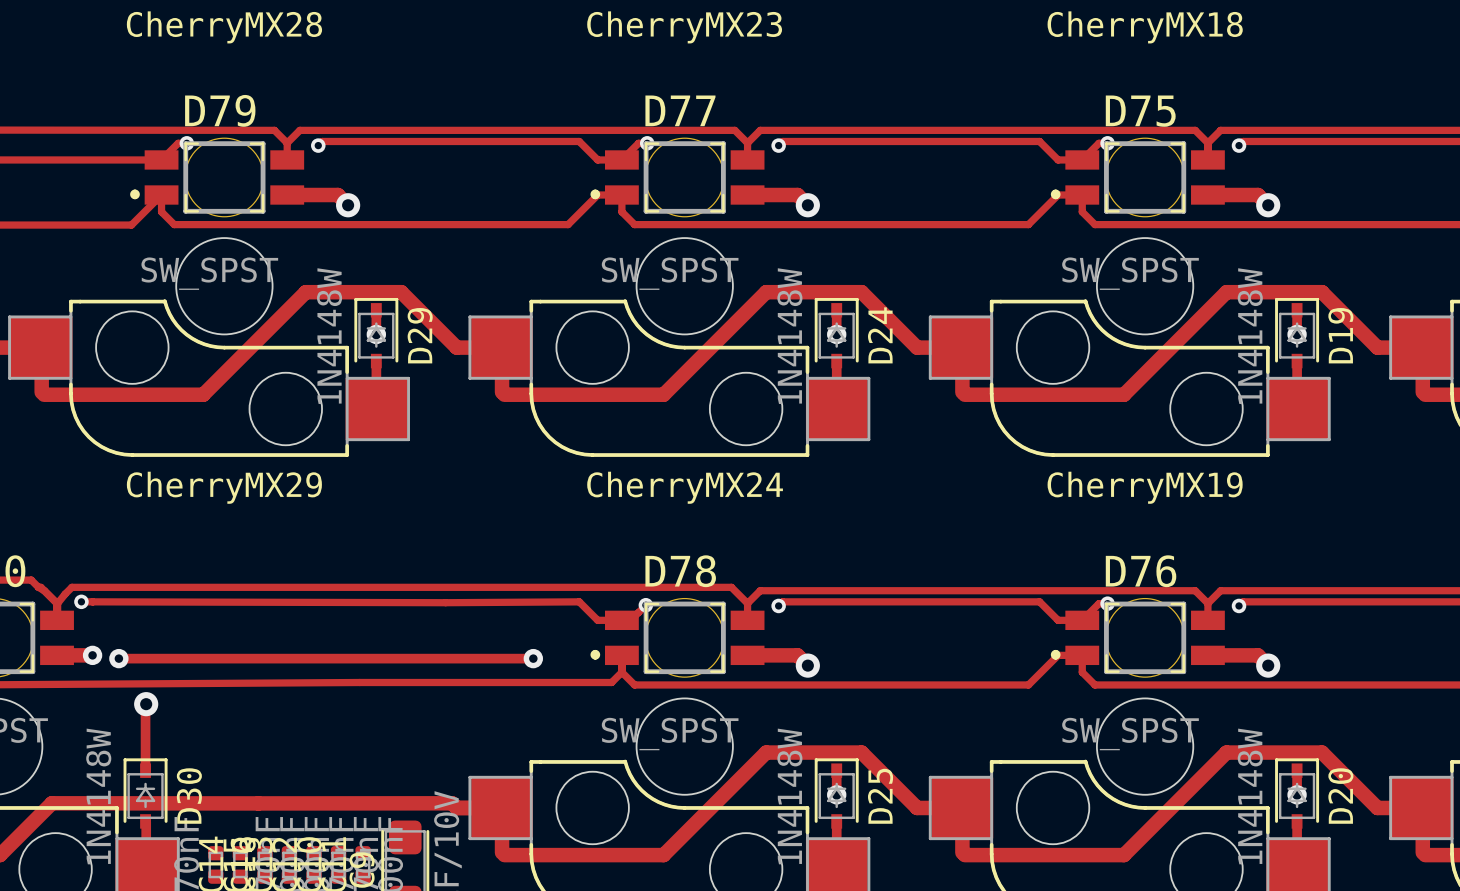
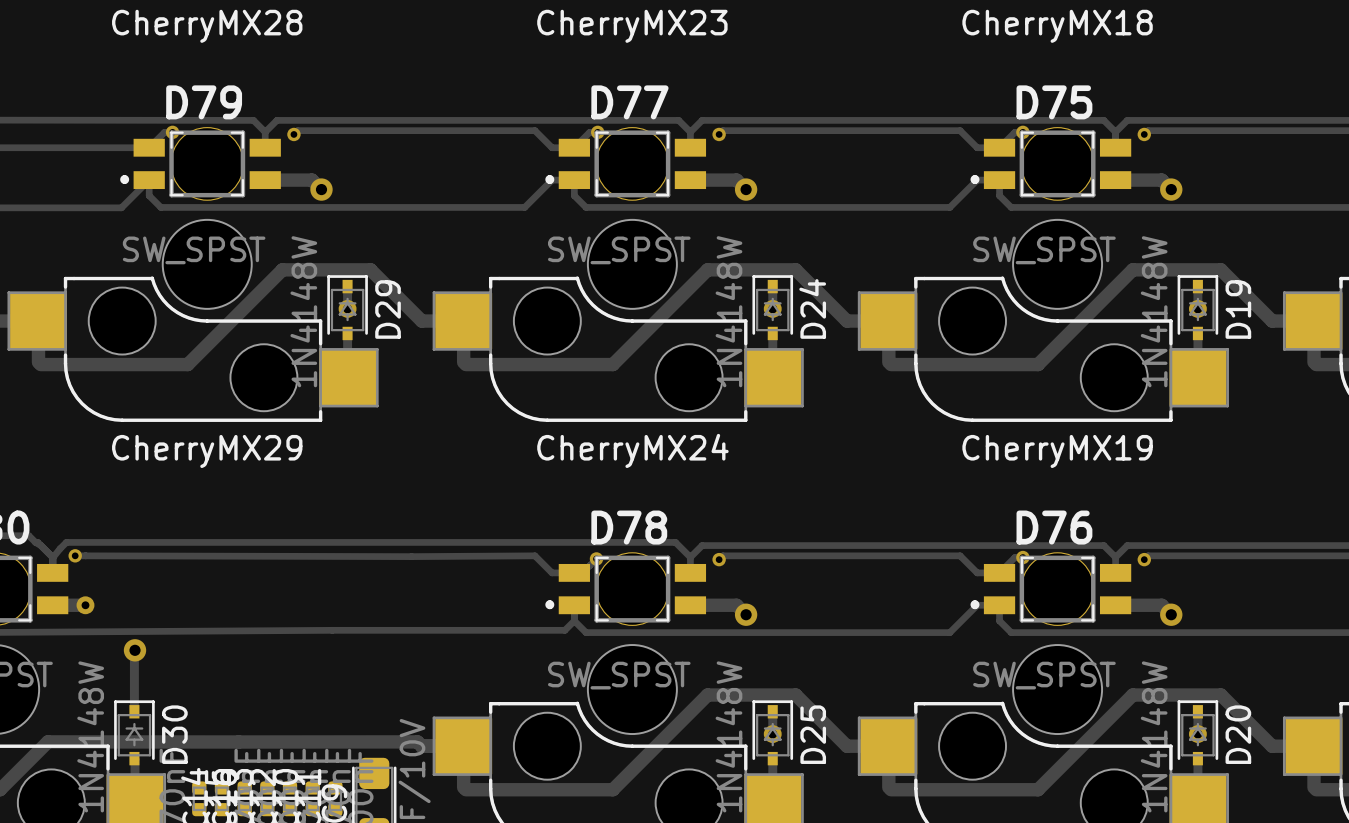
track: (118, 658) (533, 658) -> none
via: (118, 658) -> none
via: (533, 658) -> none

